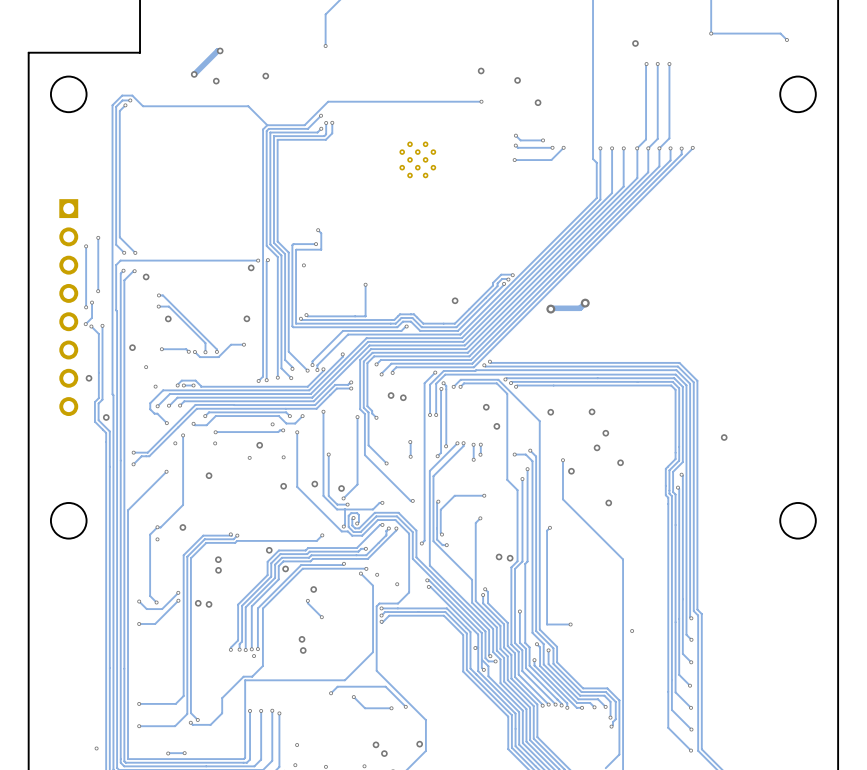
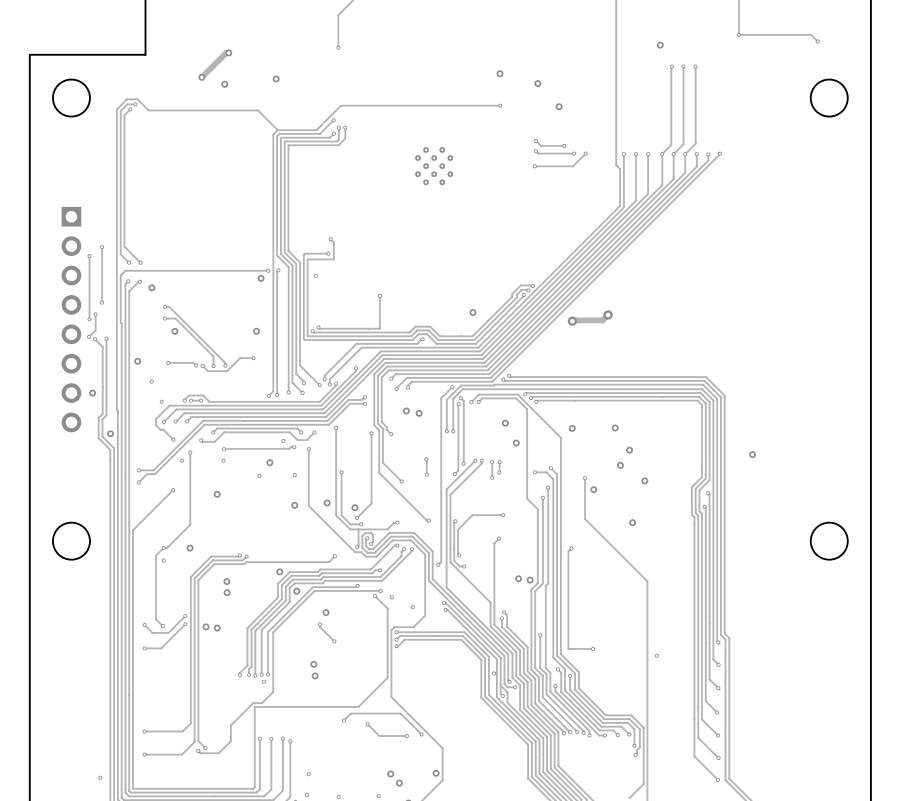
via: (168, 753) -> none
track: (184, 753) (168, 753) -> none
via: (184, 753) -> none

